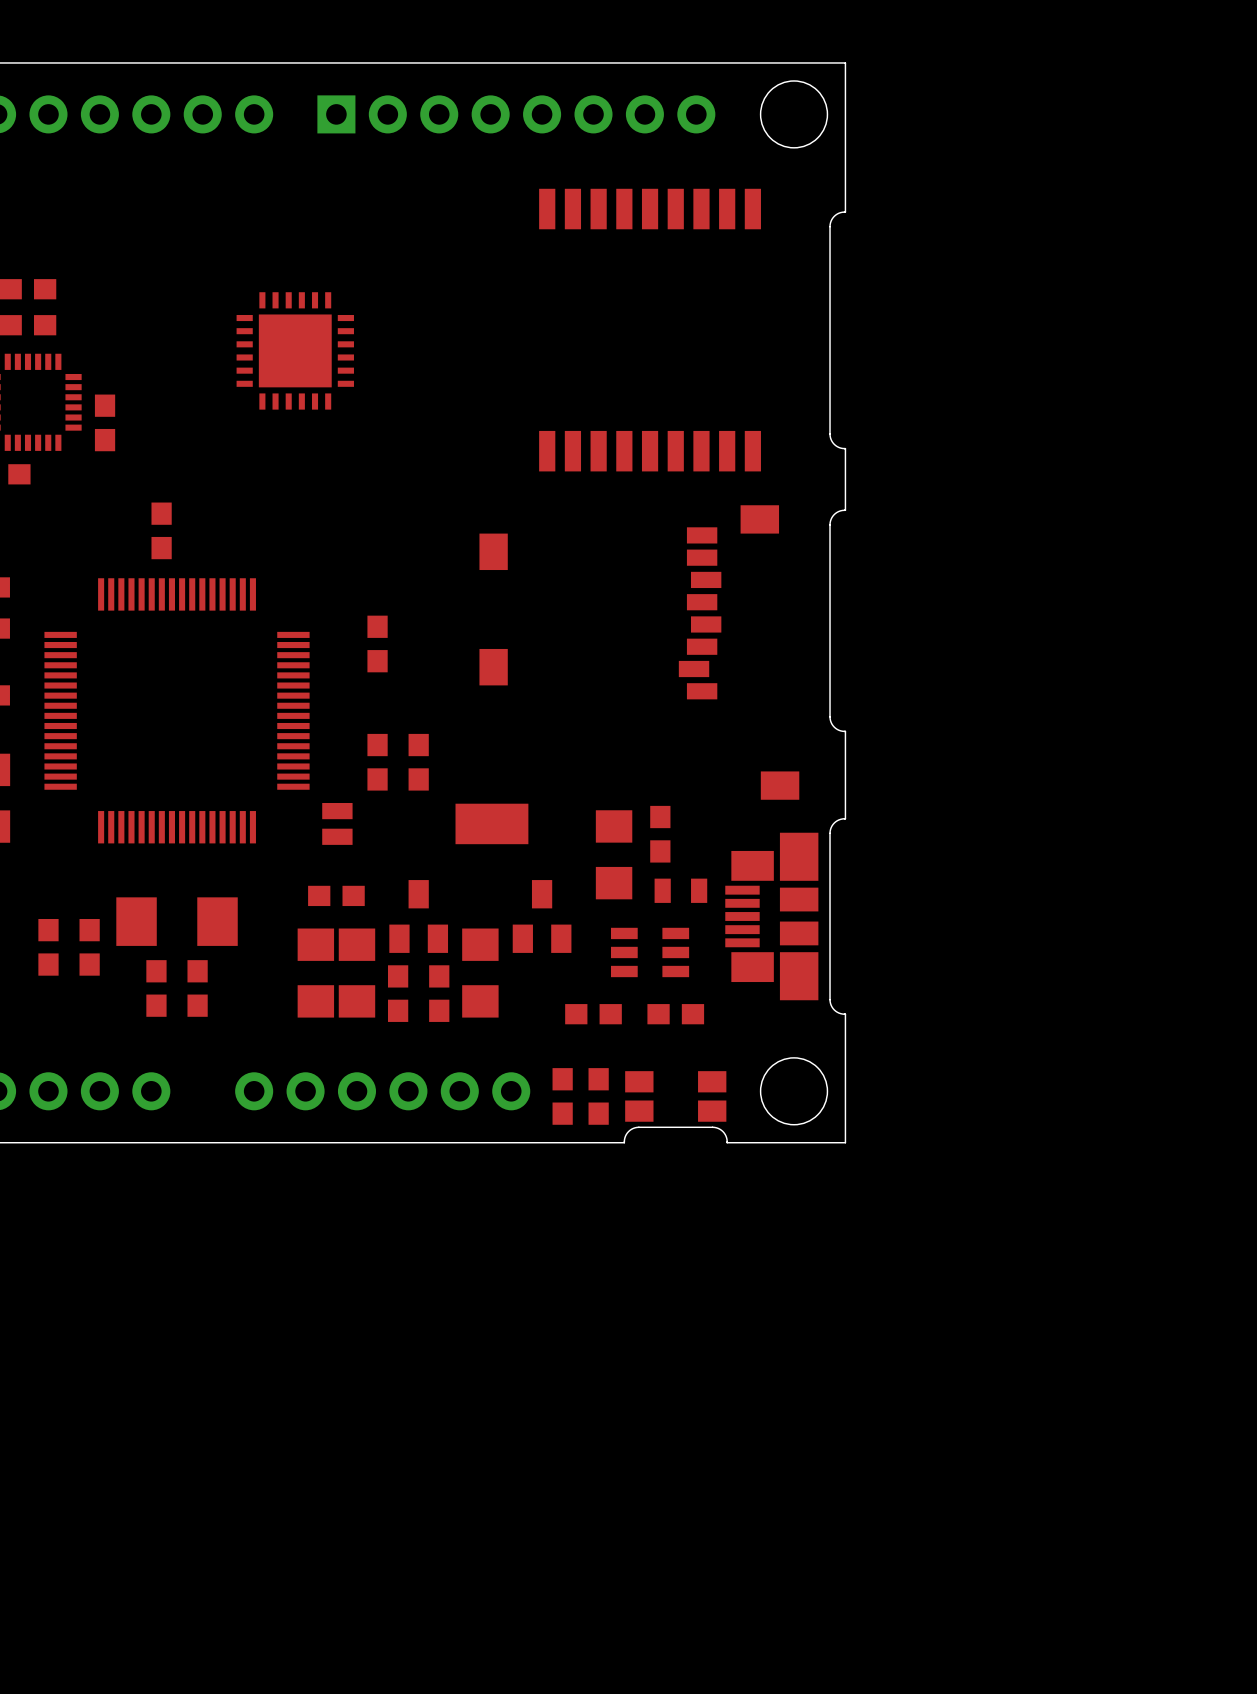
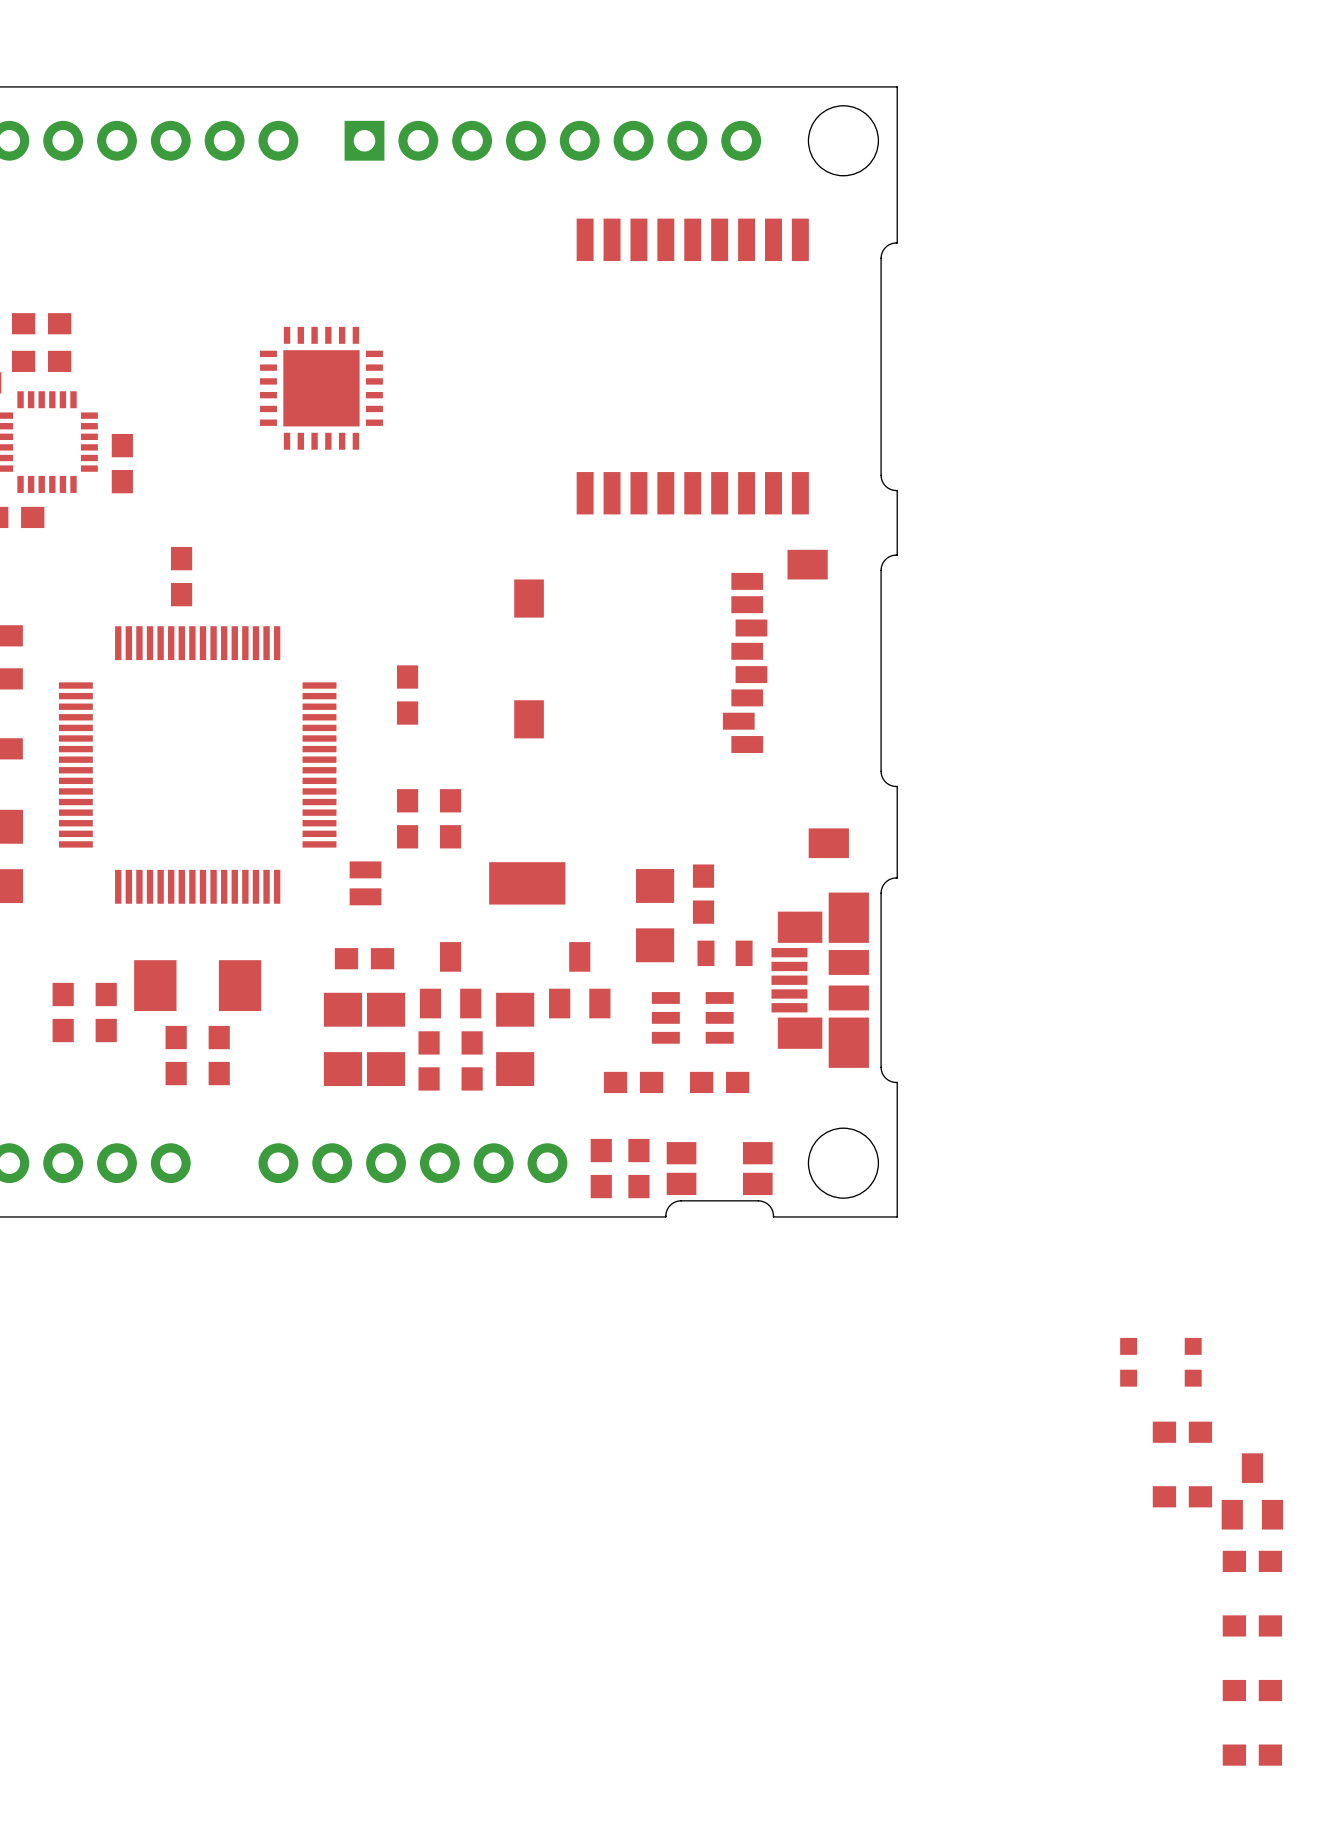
part: none -> (1128, 1362)
part: none -> (1193, 1362)
part: none -> (1182, 1432)
part: none -> (1252, 1491)
part: none -> (1182, 1496)
part: none -> (1252, 1561)
part: none -> (1252, 1625)
part: none -> (1252, 1690)
part: none -> (1252, 1755)

